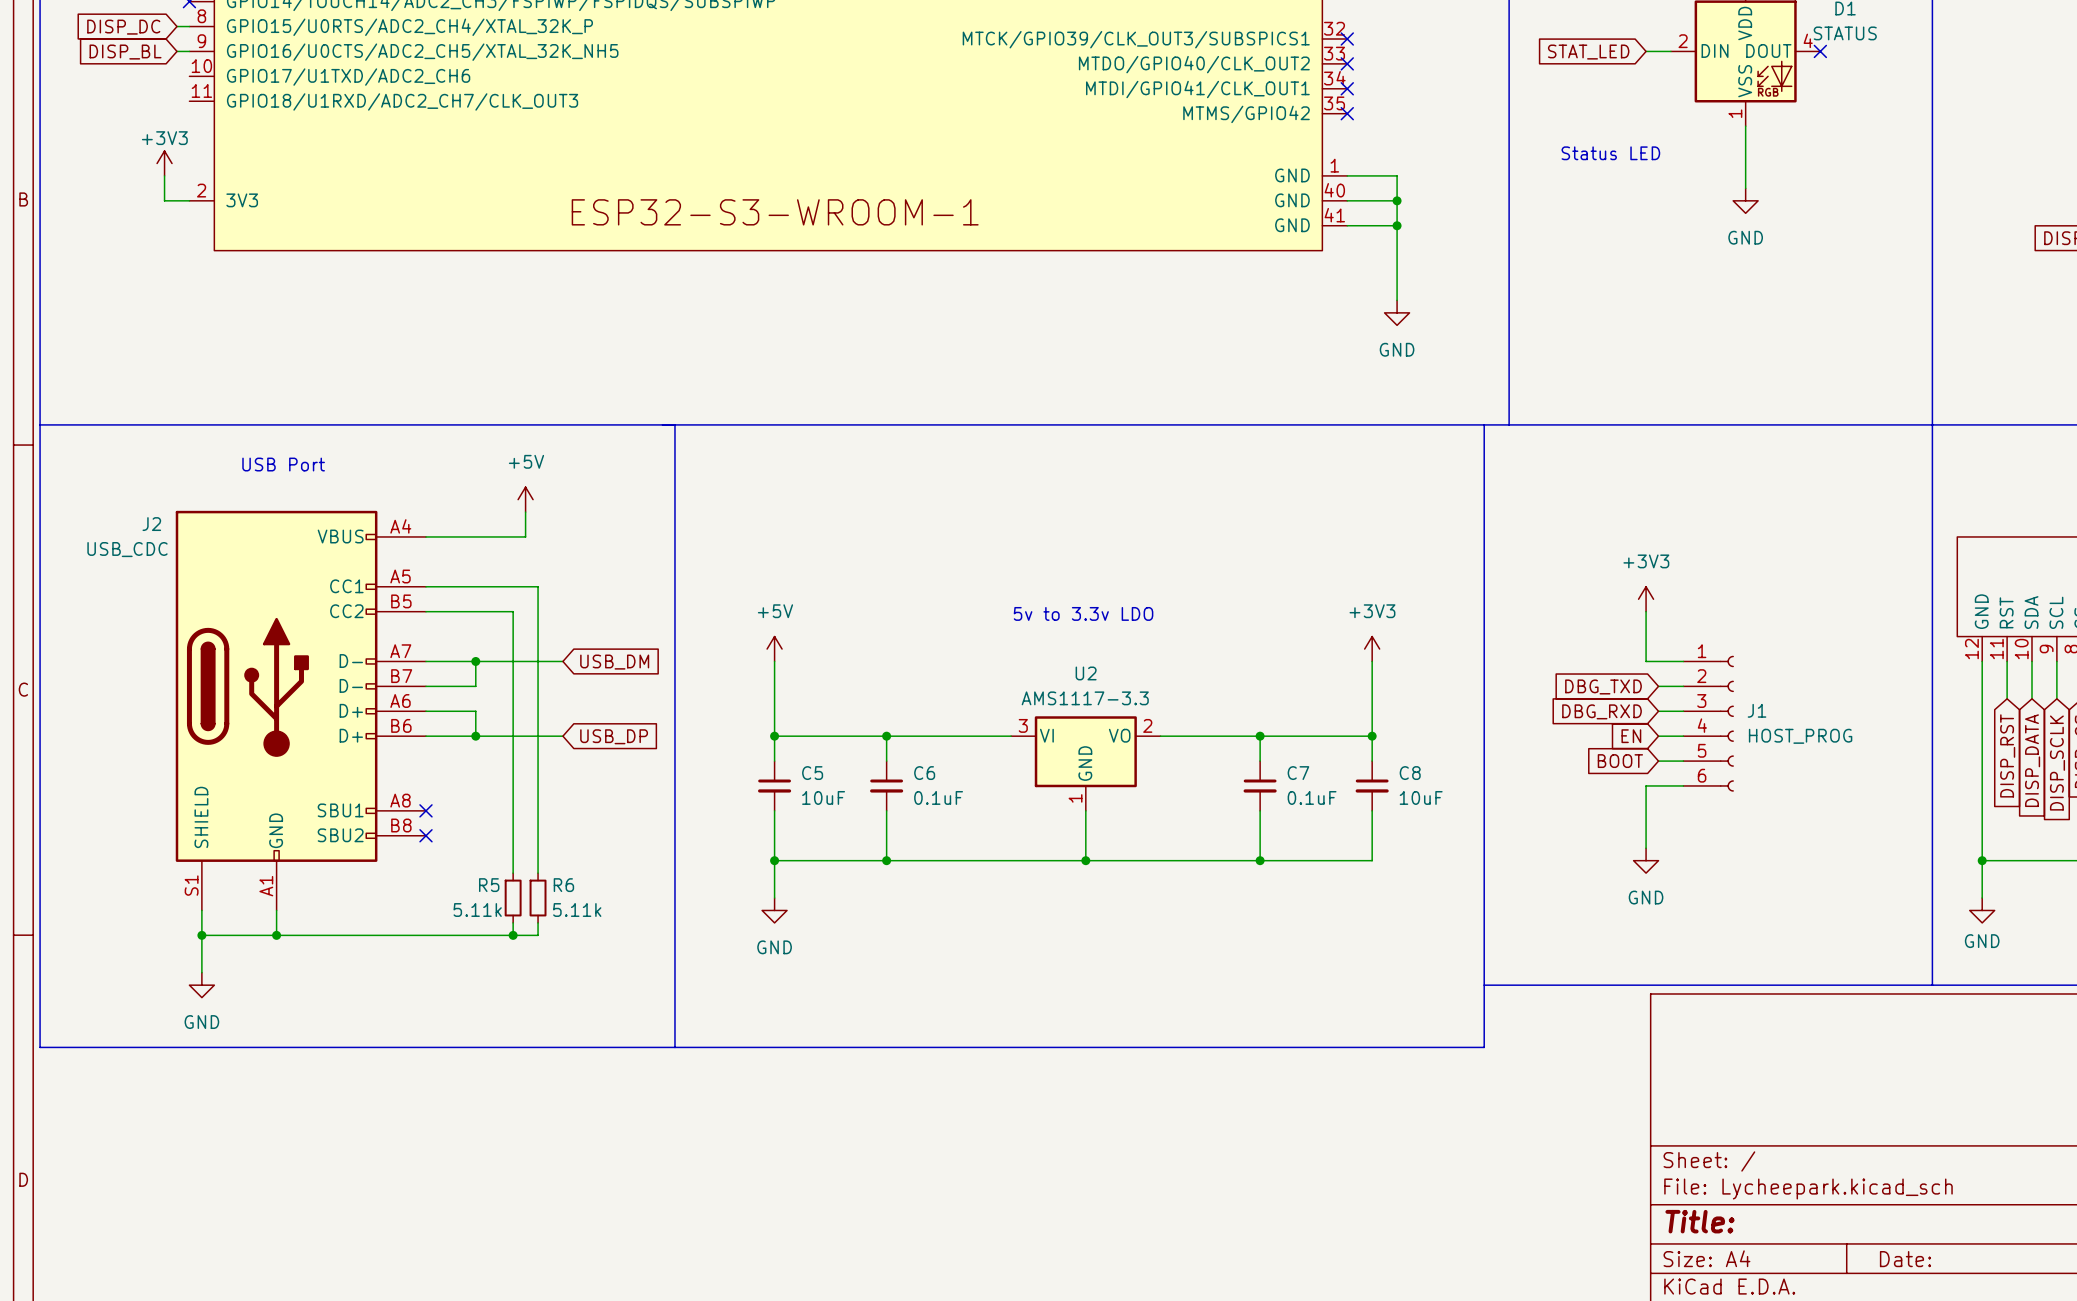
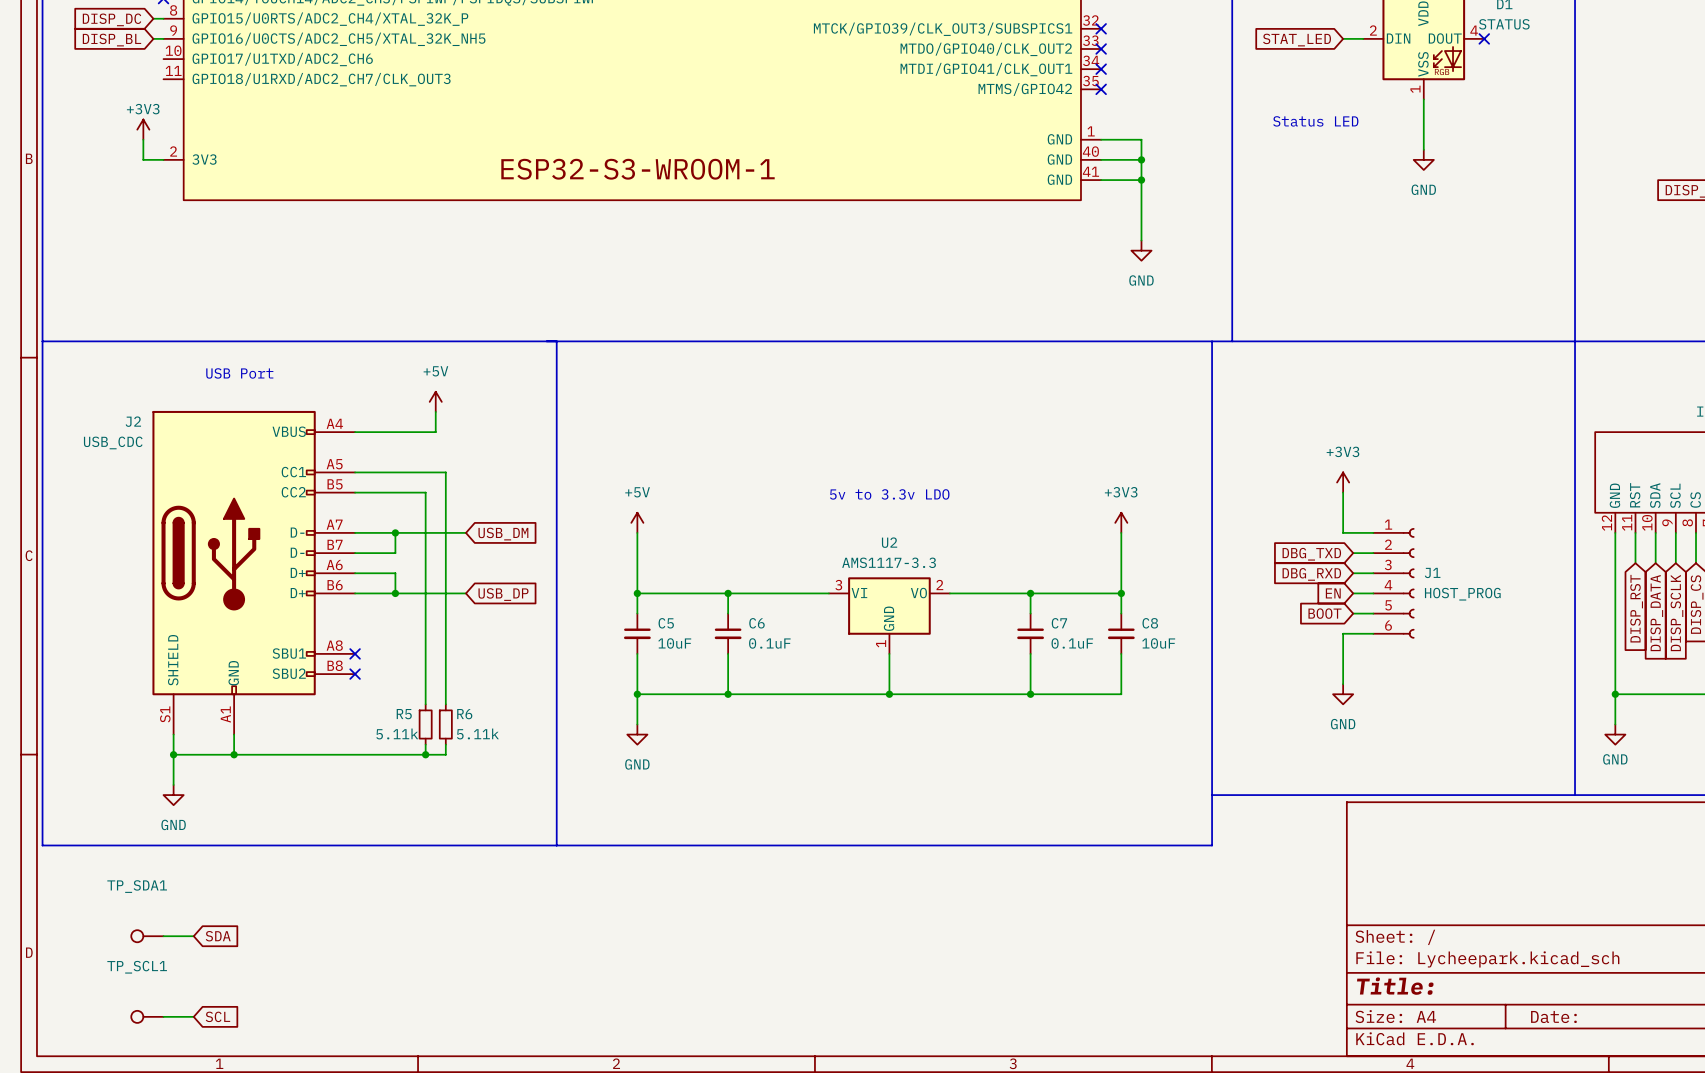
TP_SDA1: none -> (147, 936)
wire: none -> (163, 936) (193, 936)
global label: none -> SDA (218, 936)
TP_SCL1: none -> (147, 1016)
wire: none -> (163, 1016) (193, 1016)
global label: none -> SCL (217, 1016)

